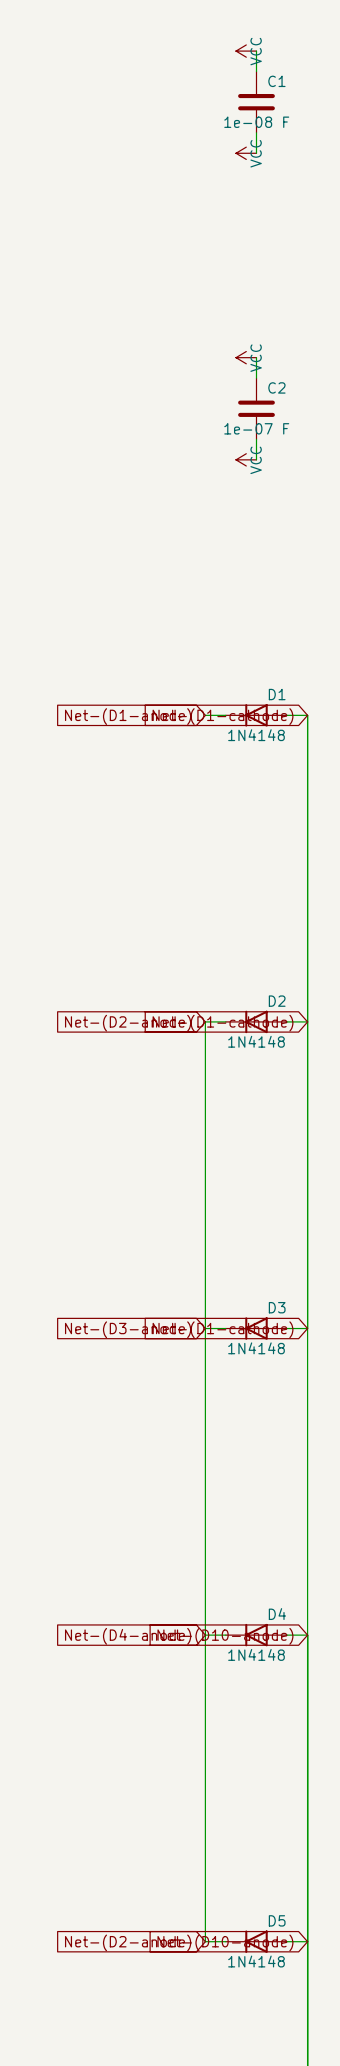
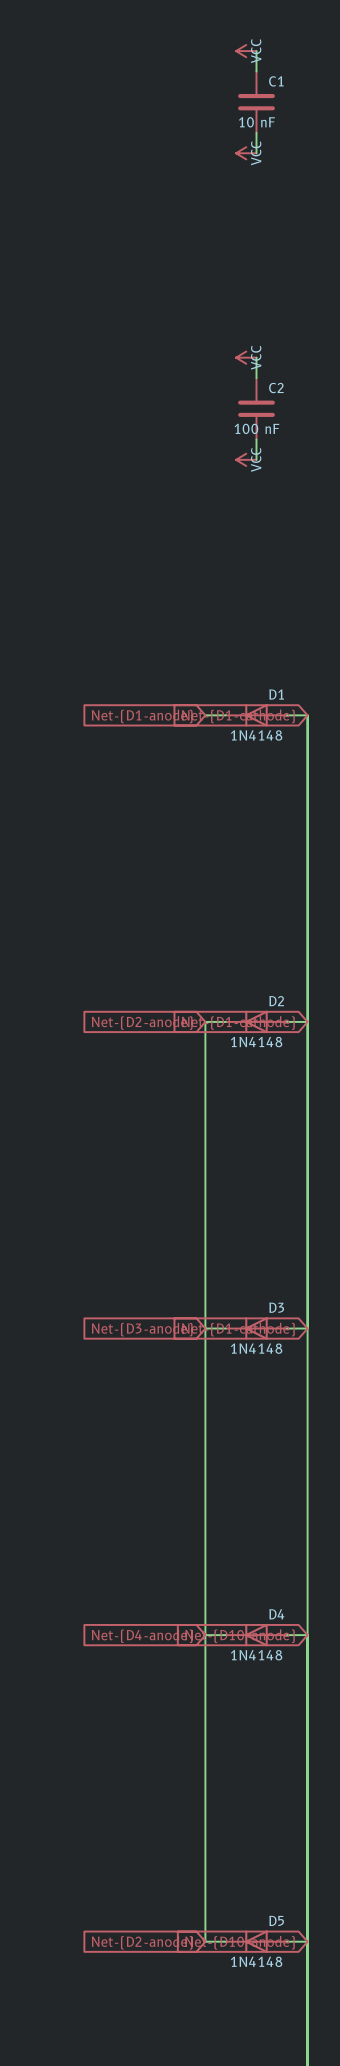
C1 value: 1e-08 F (256, 122) -> 10 nF (256, 122)
C2 value: 1e-07 F (256, 428) -> 100 nF (256, 428)

